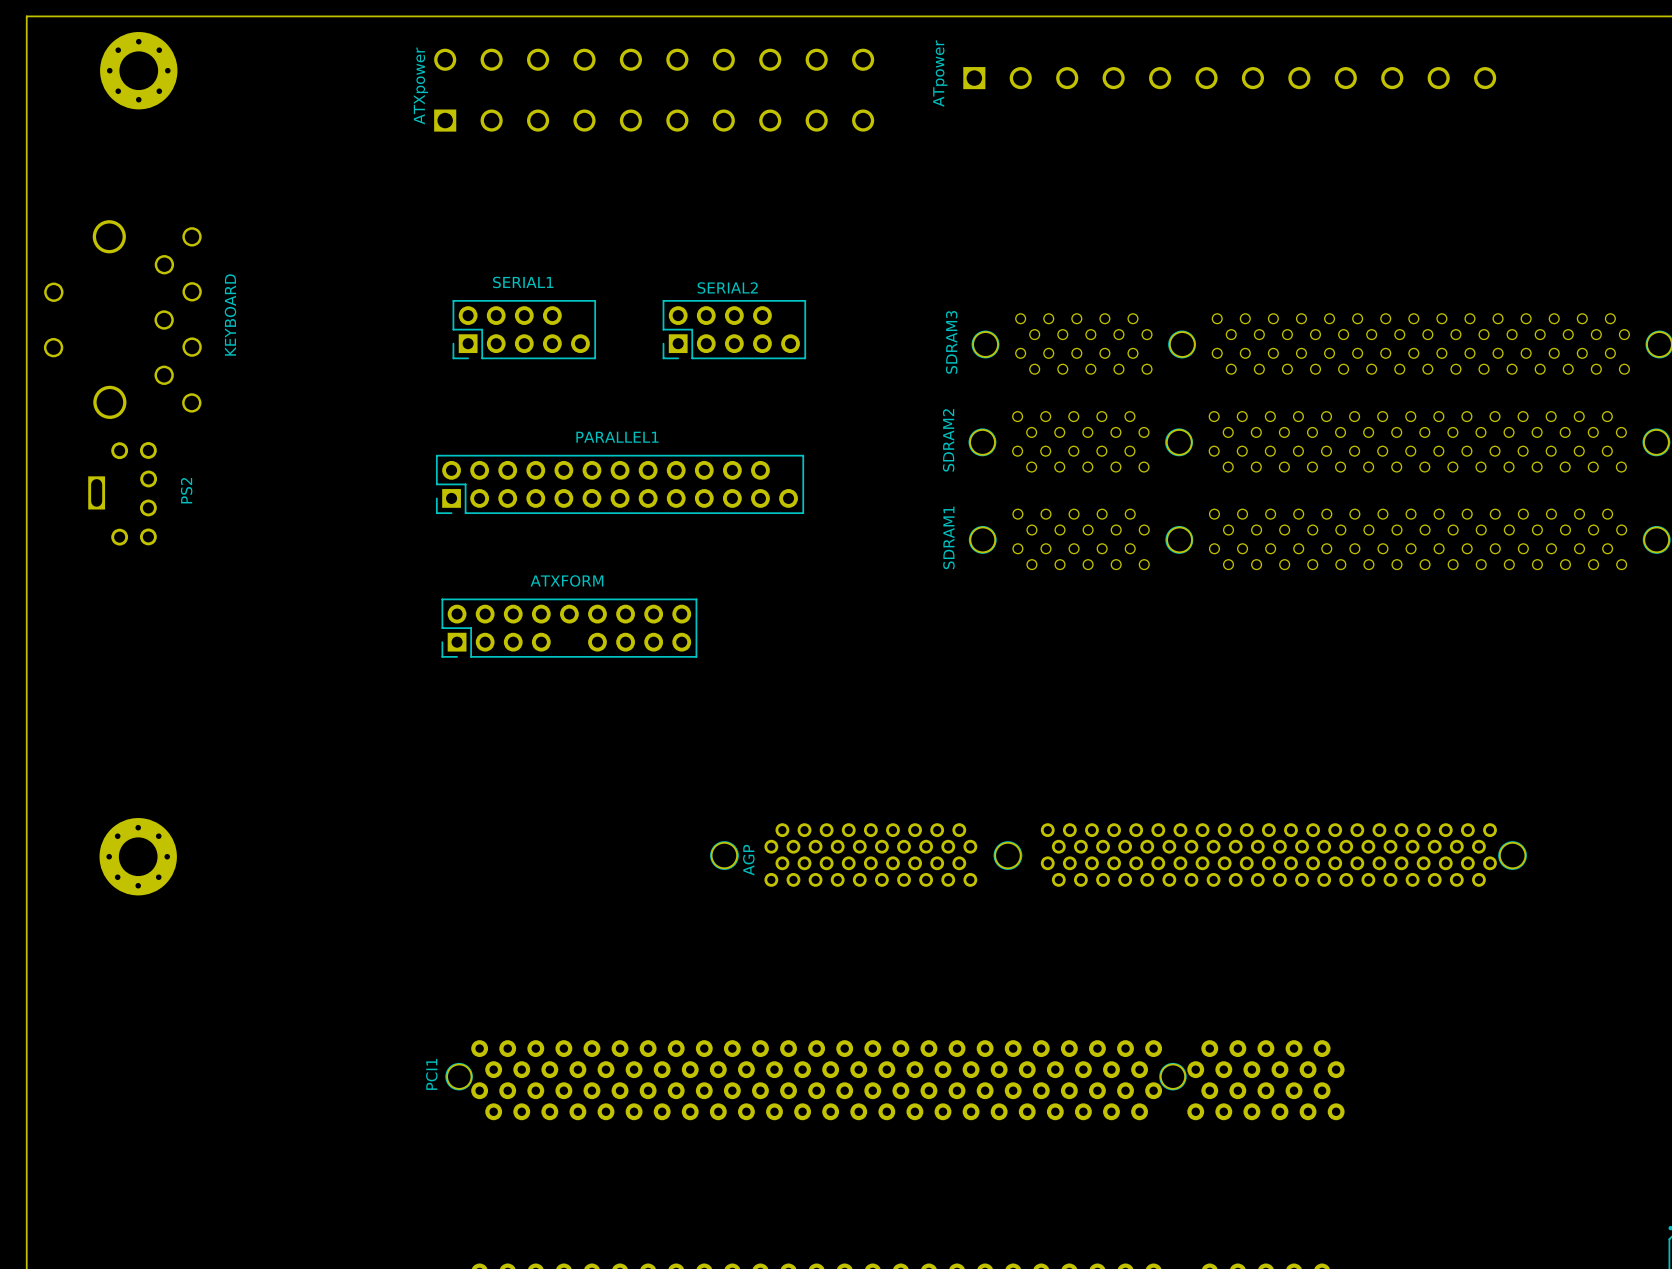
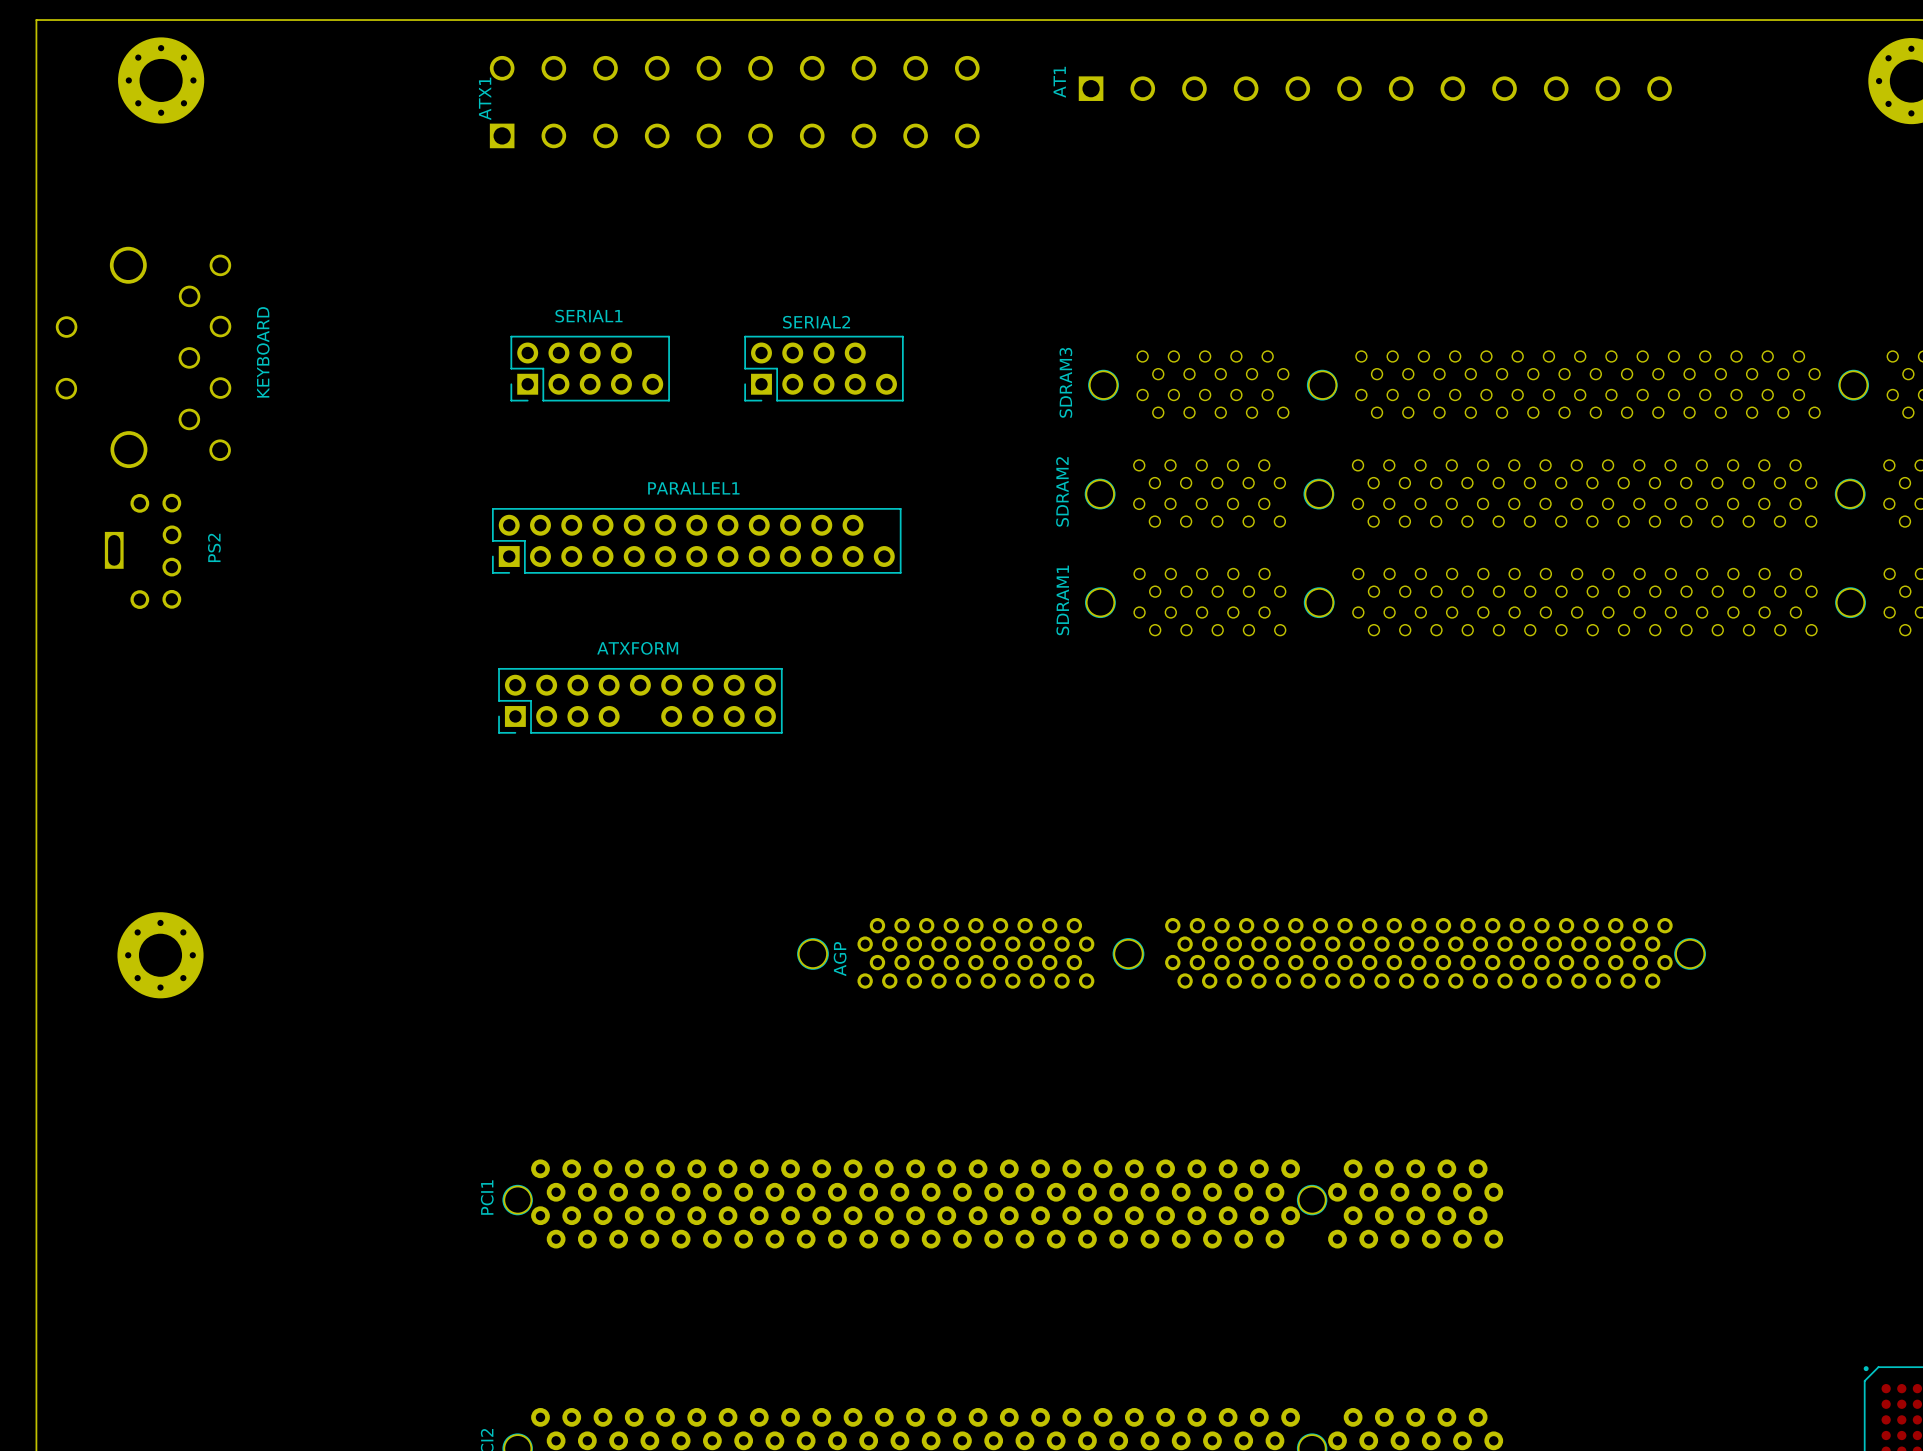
ATpower name: ATpower (940, 73) -> AT1 (1059, 82)
ATXpower name: ATXpower (420, 86) -> ATX1 (485, 98)

